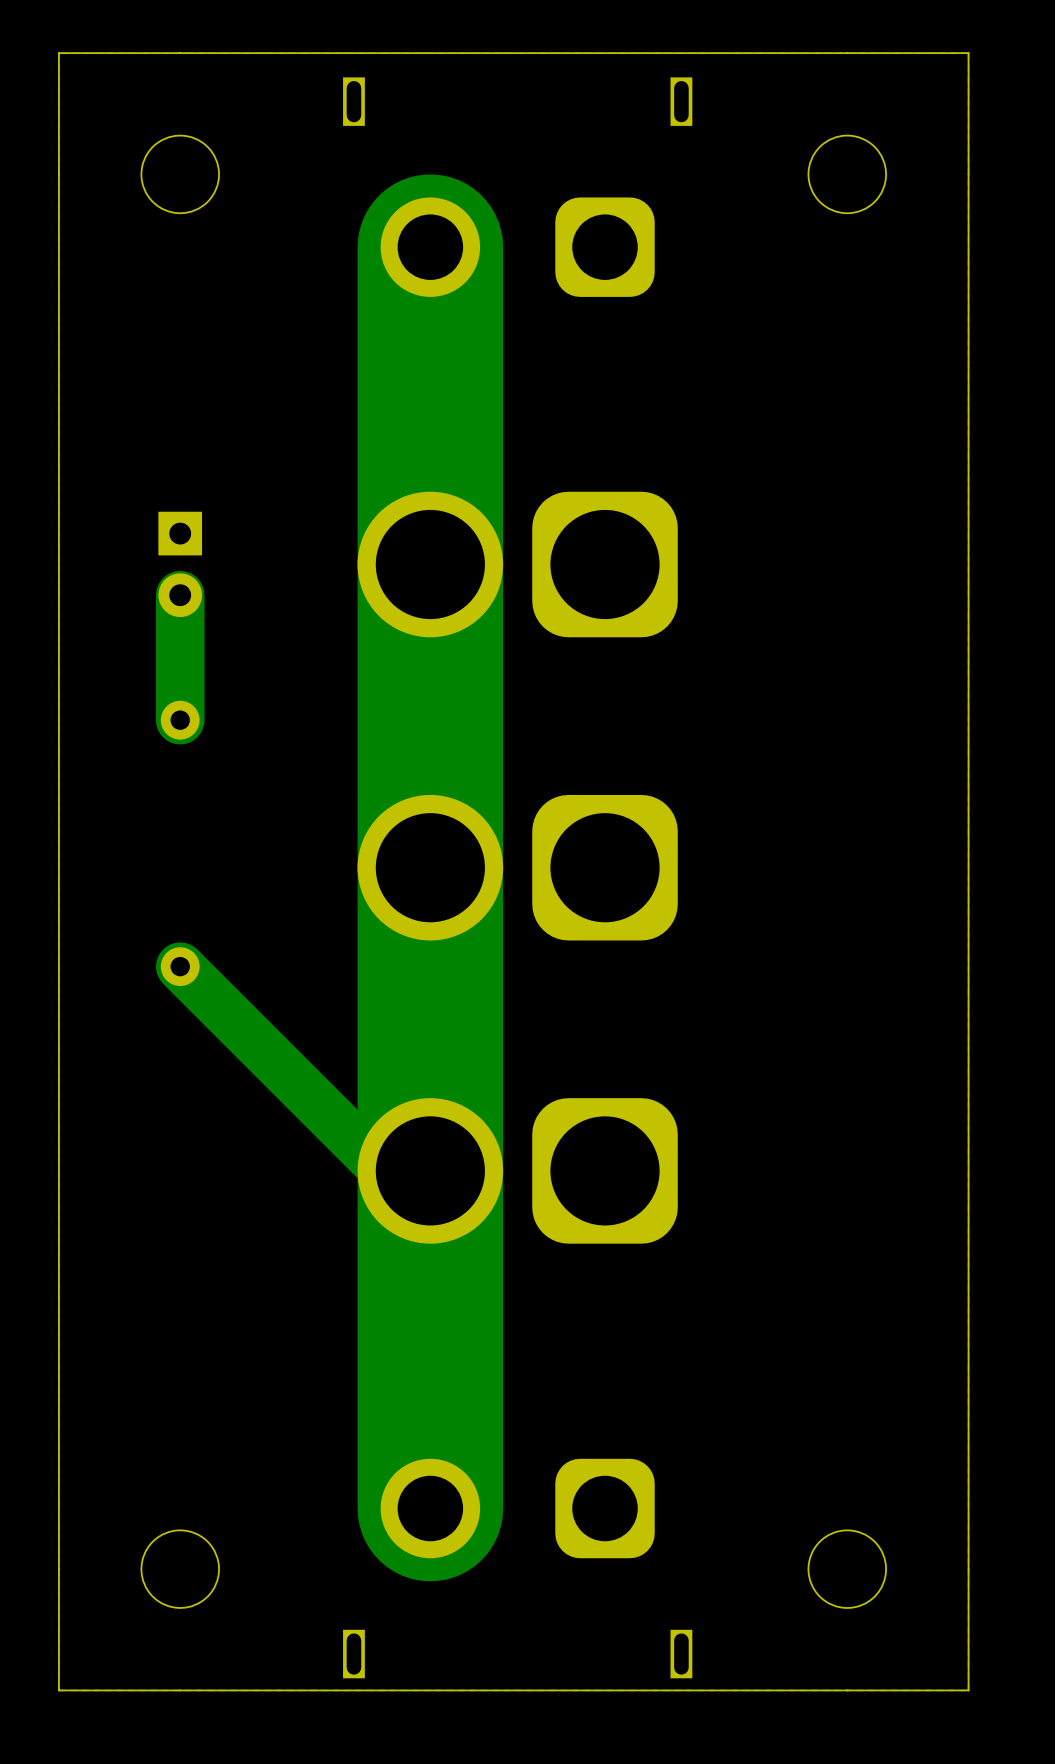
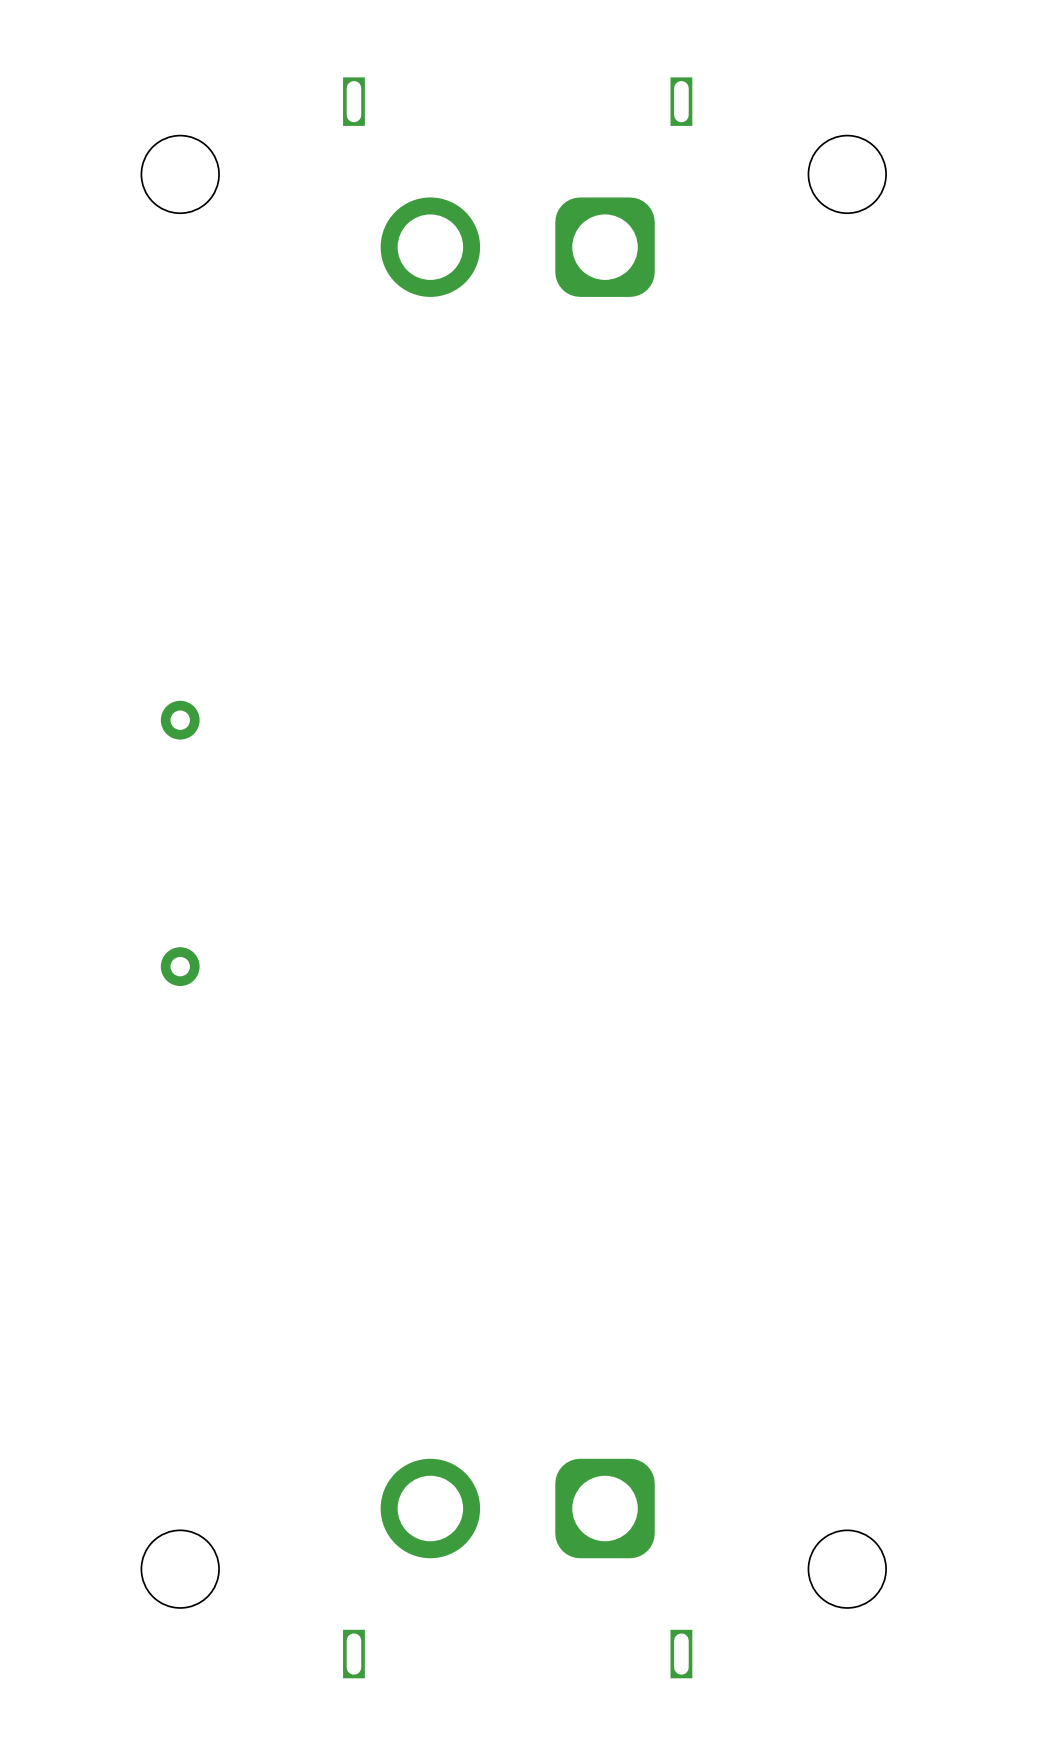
board edge: (968, 53) (58, 53) (58, 1690) (968, 1690) (968, 53) -> none
bottom track: (430, 247) (430, 1508) -> none
part: (180, 564) -> none
part: (517, 564) -> none
bottom track: (180, 595) (180, 720) -> none
part: (517, 867) -> none
bottom track: (180, 966) (384, 1170) (430, 1170) -> none
part: (517, 1170) -> none

